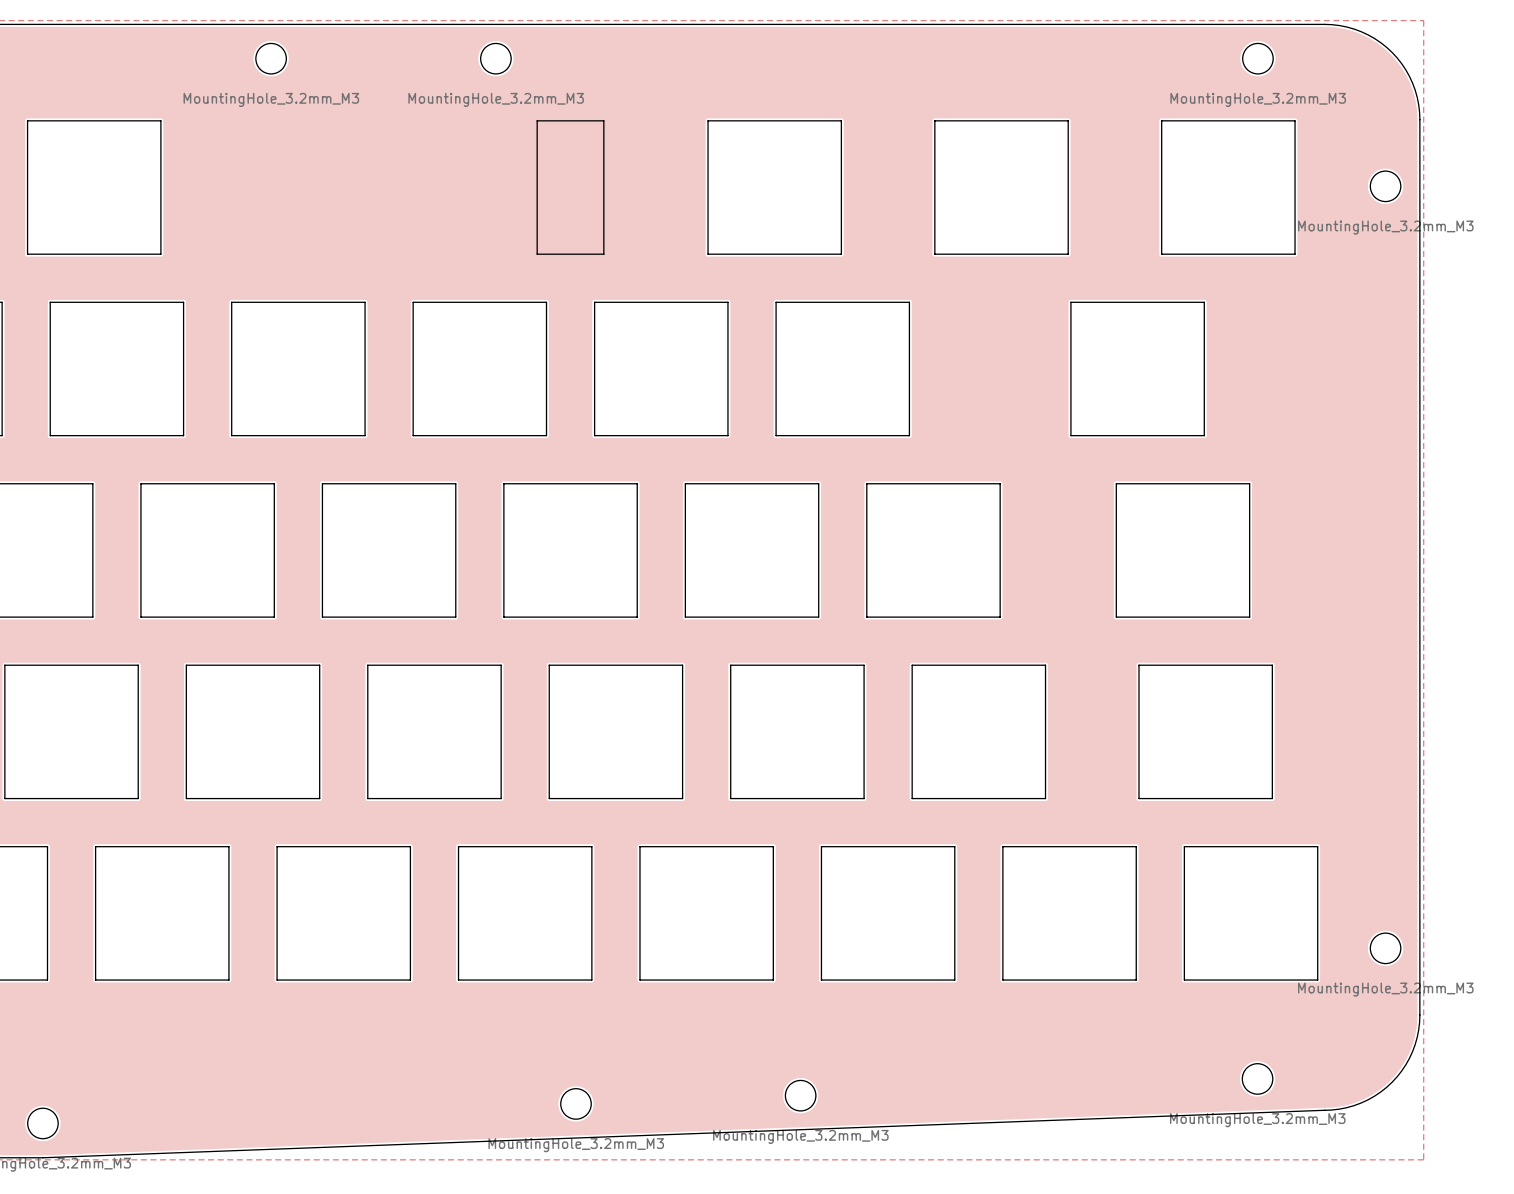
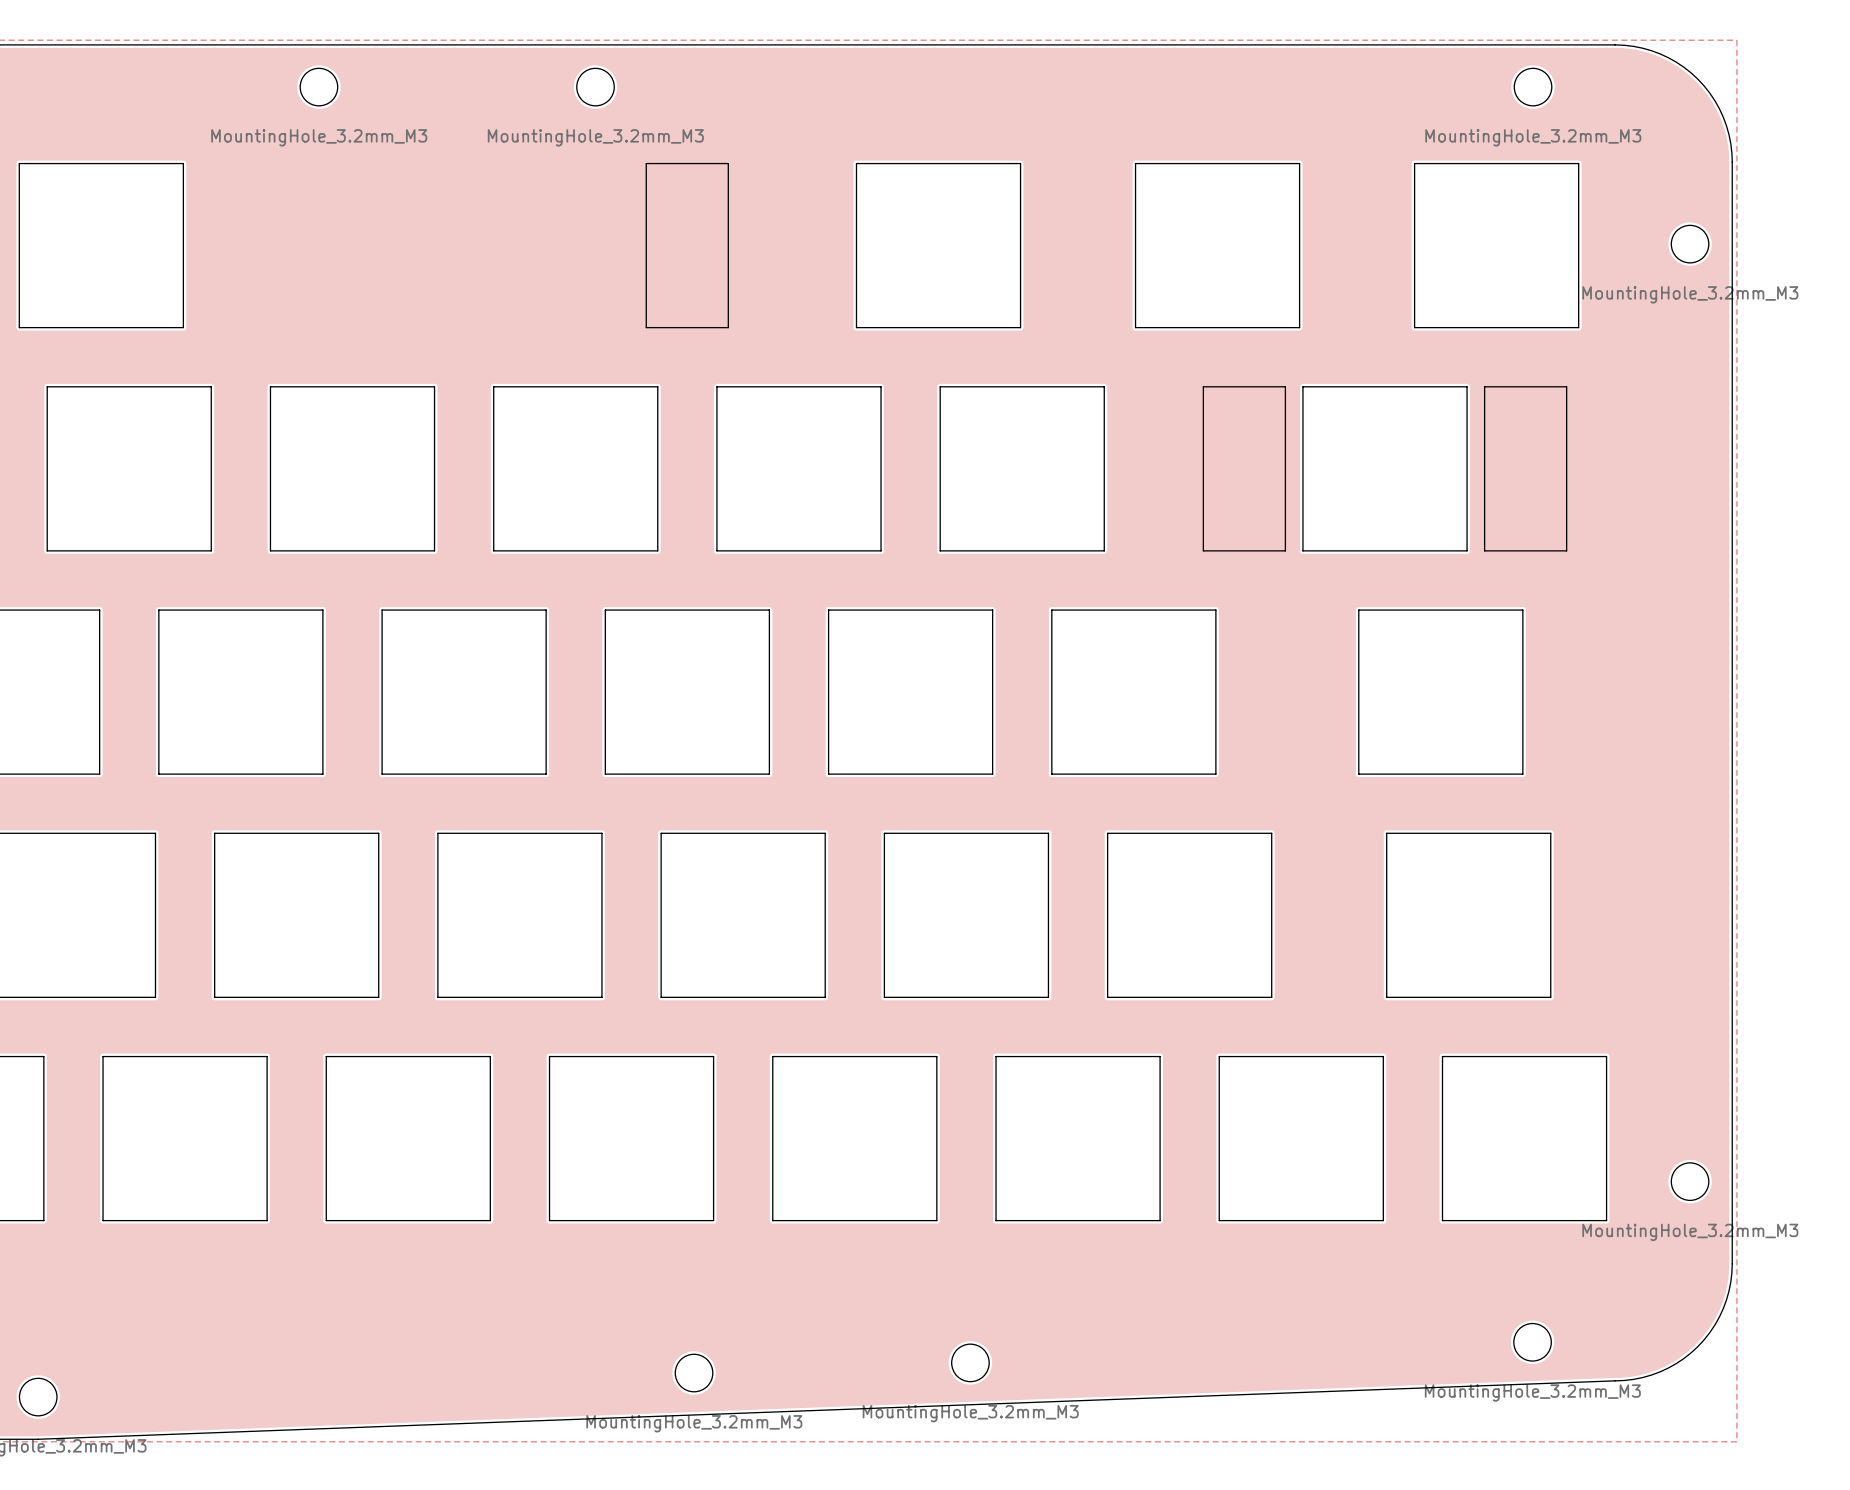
board edge: none -> (1203, 386) (1285, 386) (1285, 550) (1203, 550) (1203, 386)
board edge: none -> (1484, 386) (1566, 386) (1566, 550) (1484, 550) (1484, 386)

